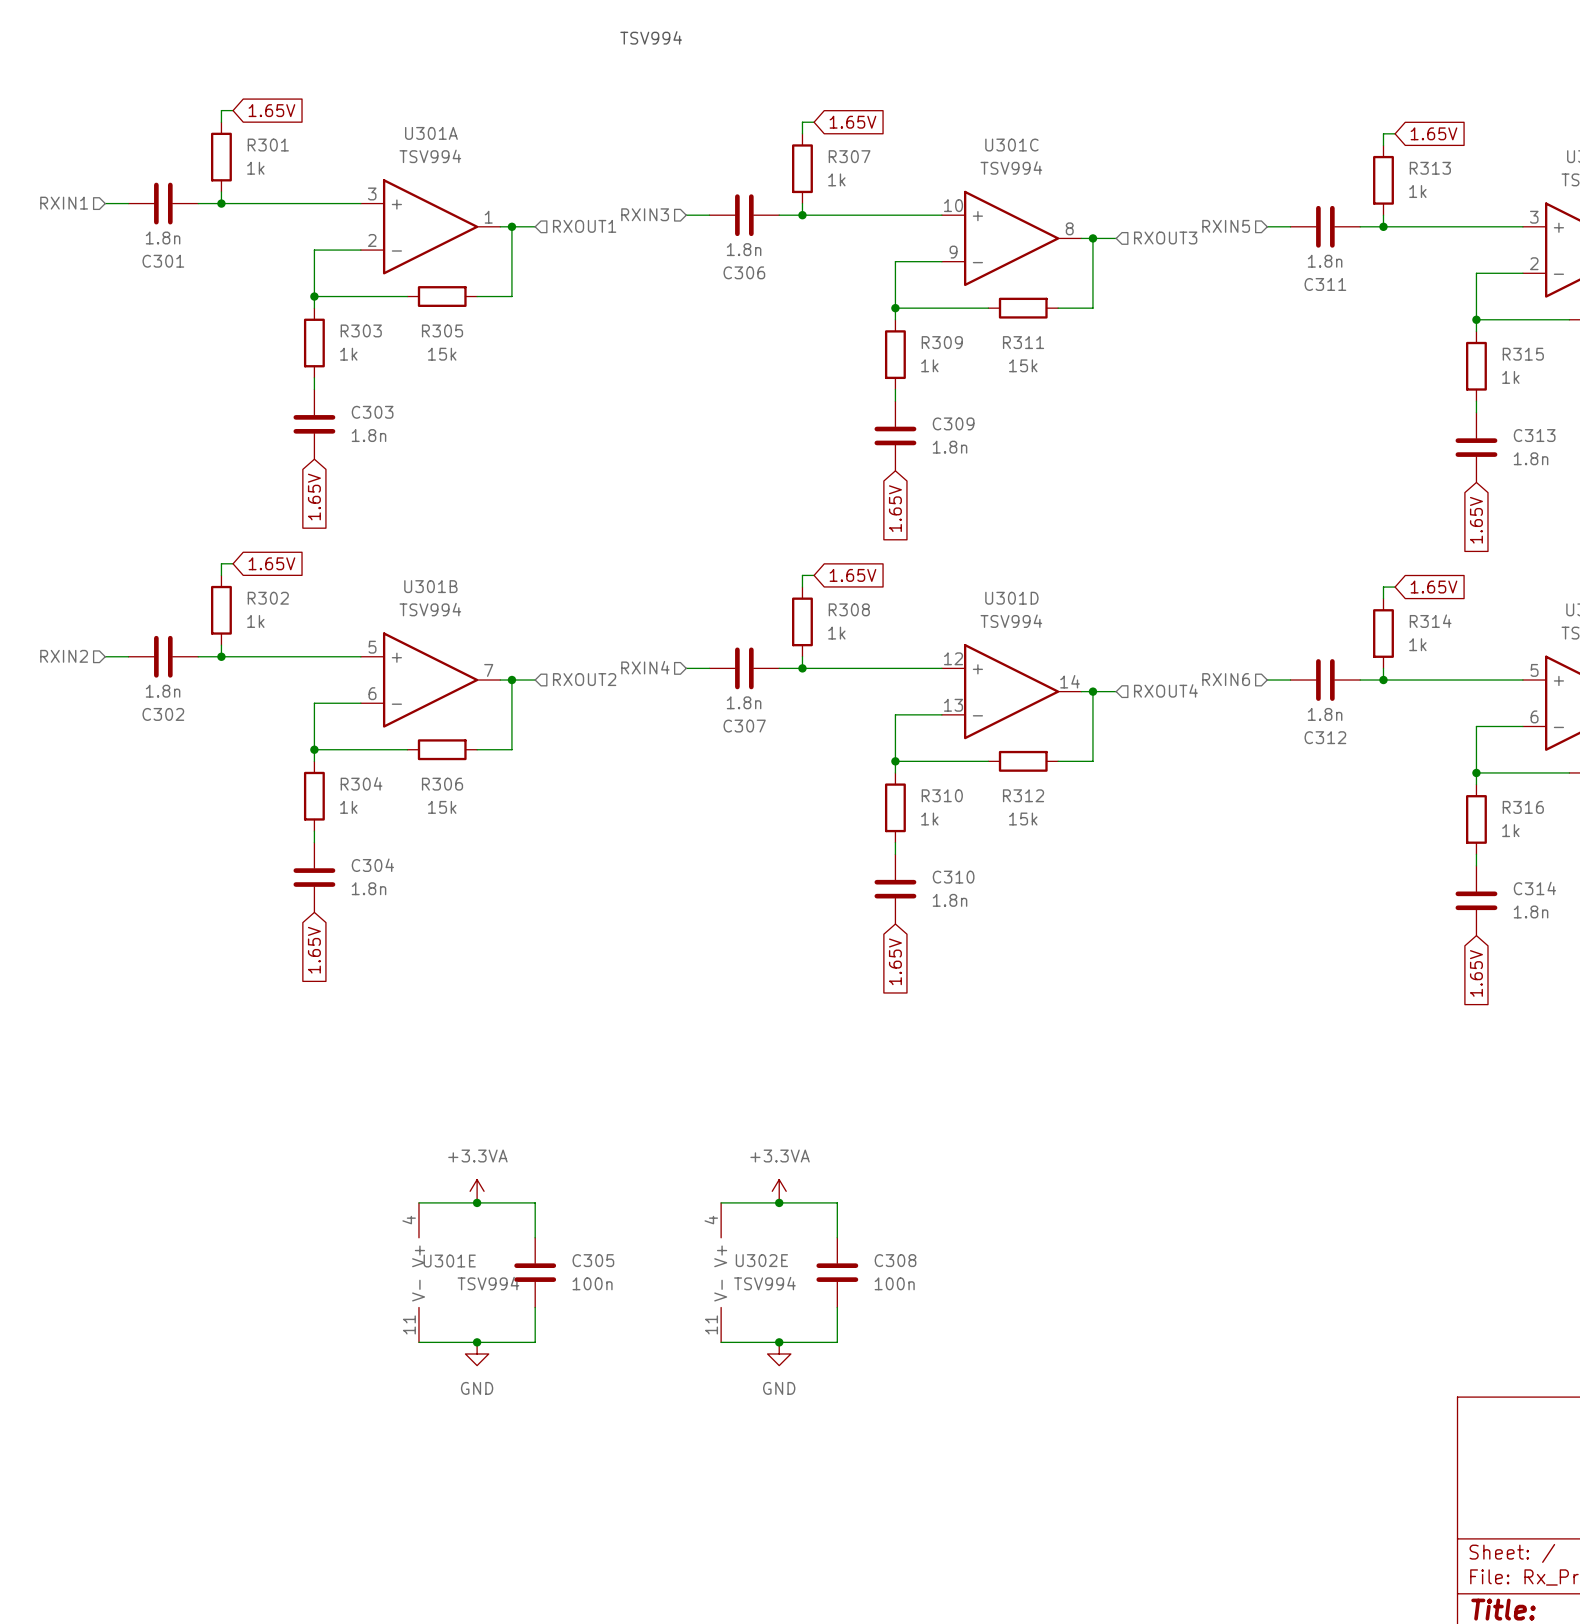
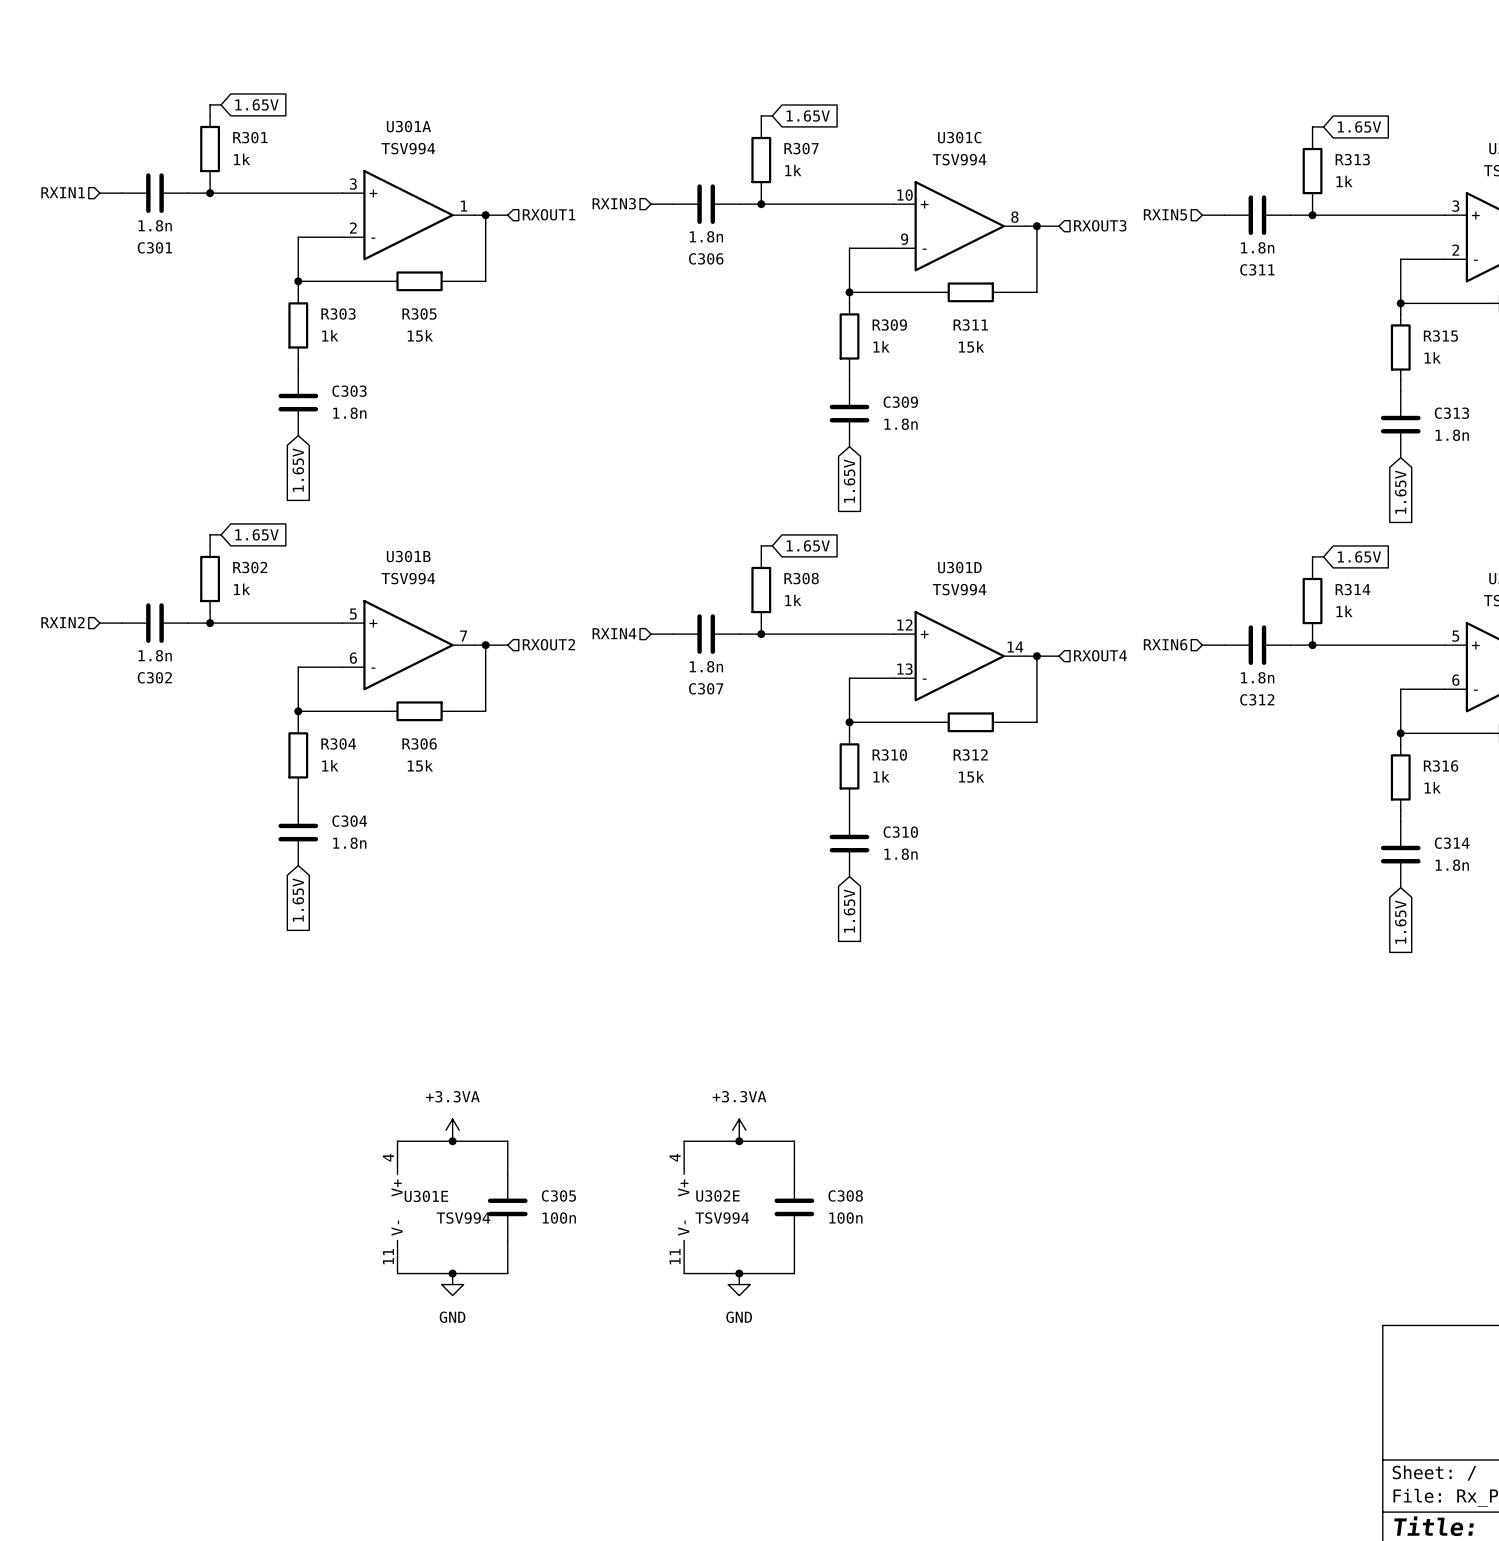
text: TSV994 (651, 37) -> none

